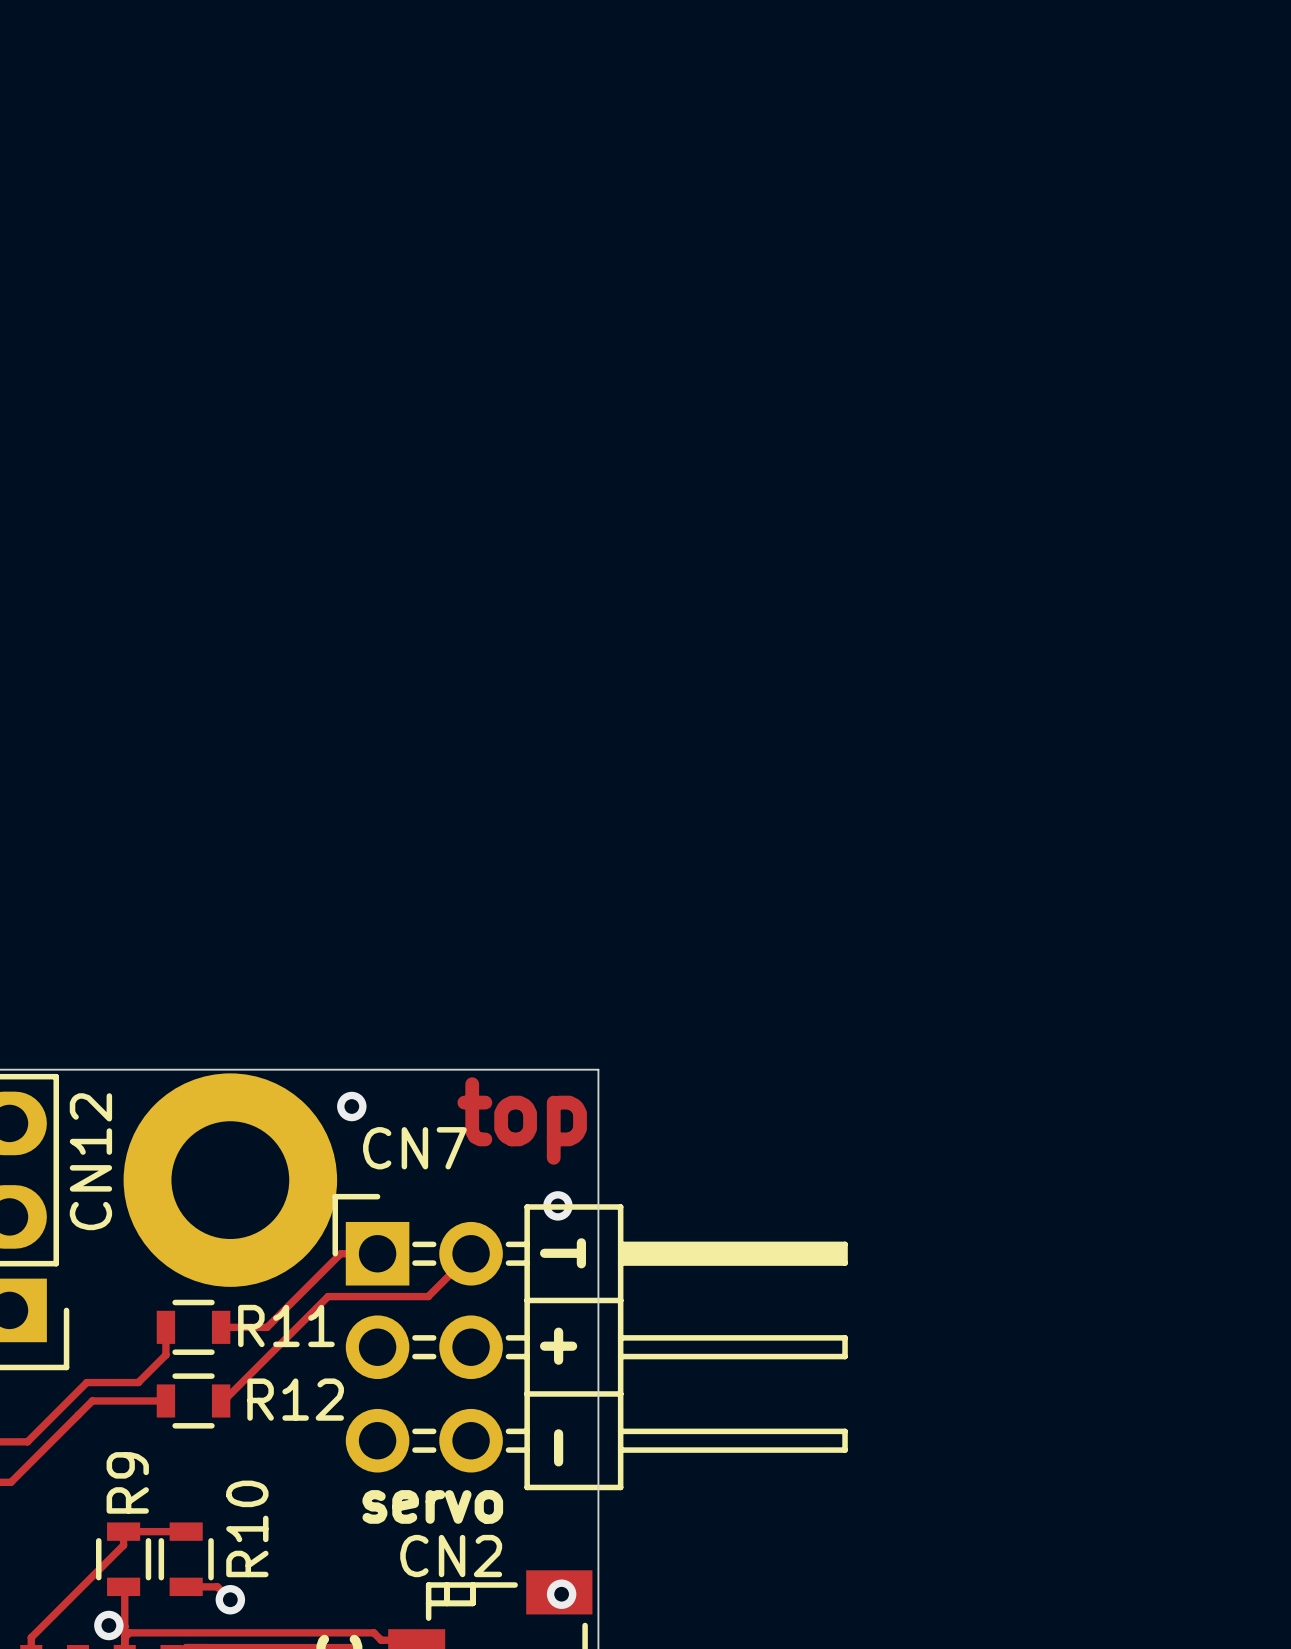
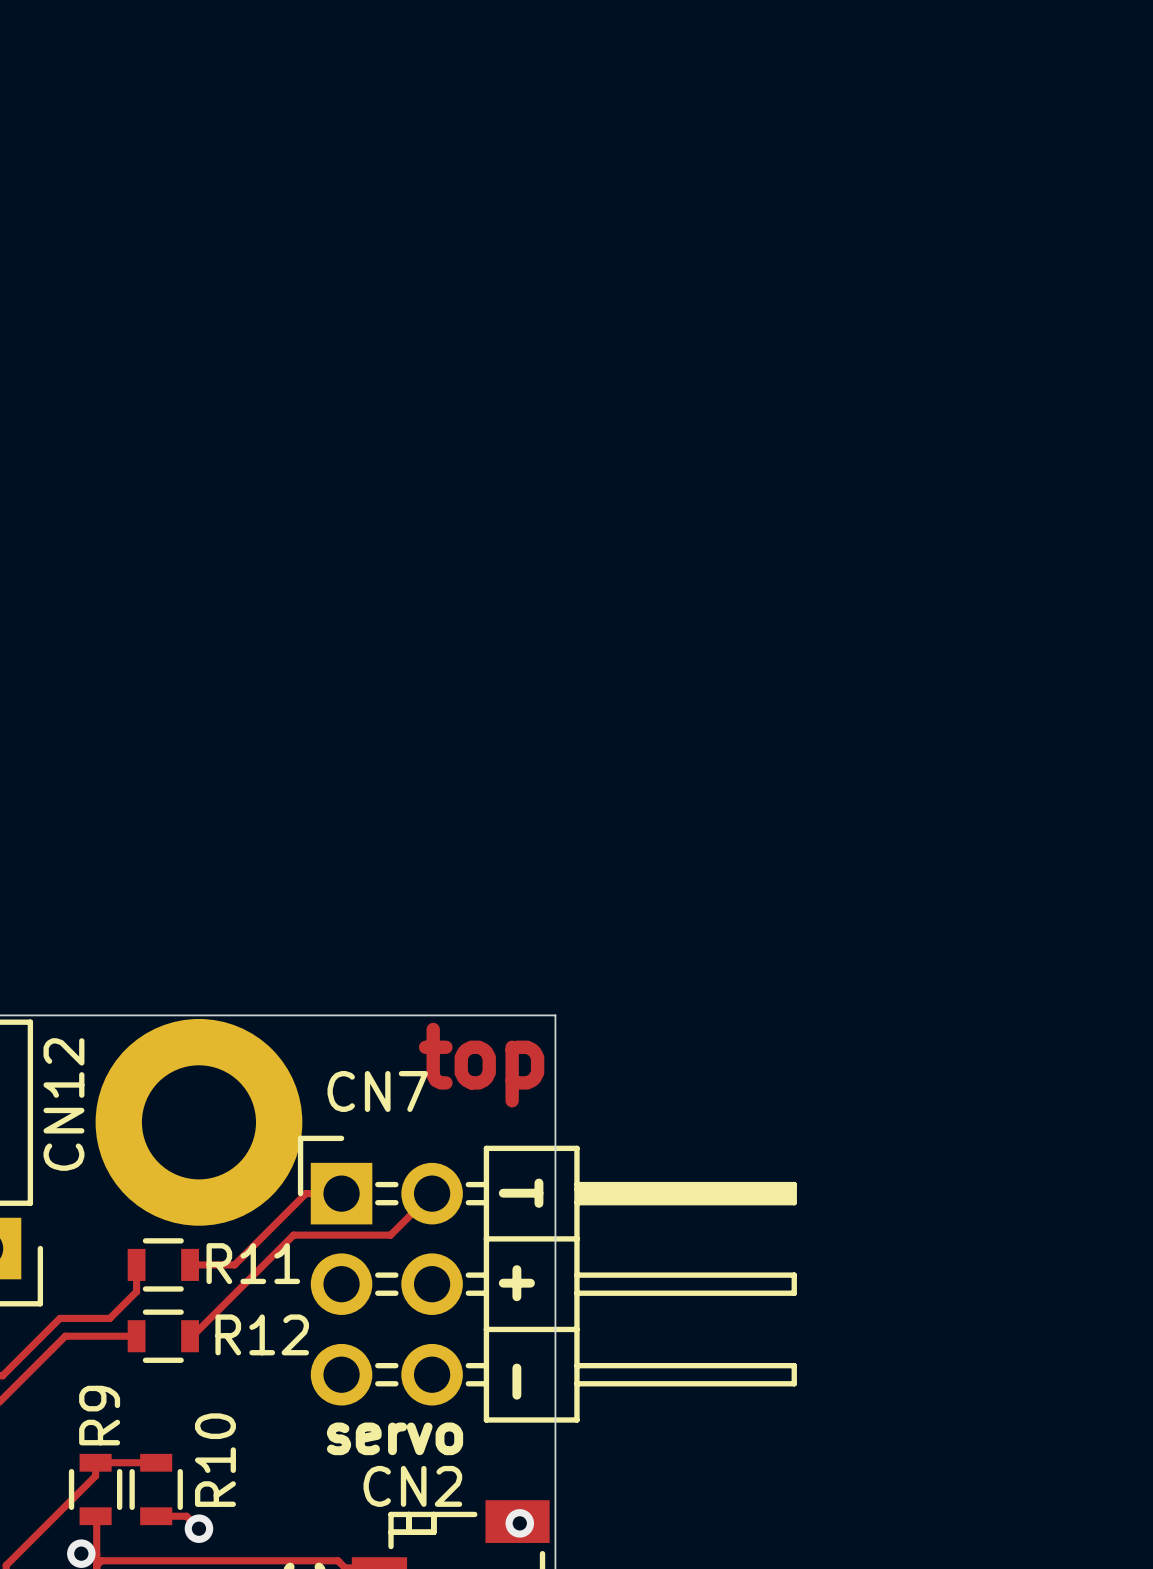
via: (351, 1106) -> none
via: (557, 1205) -> none

